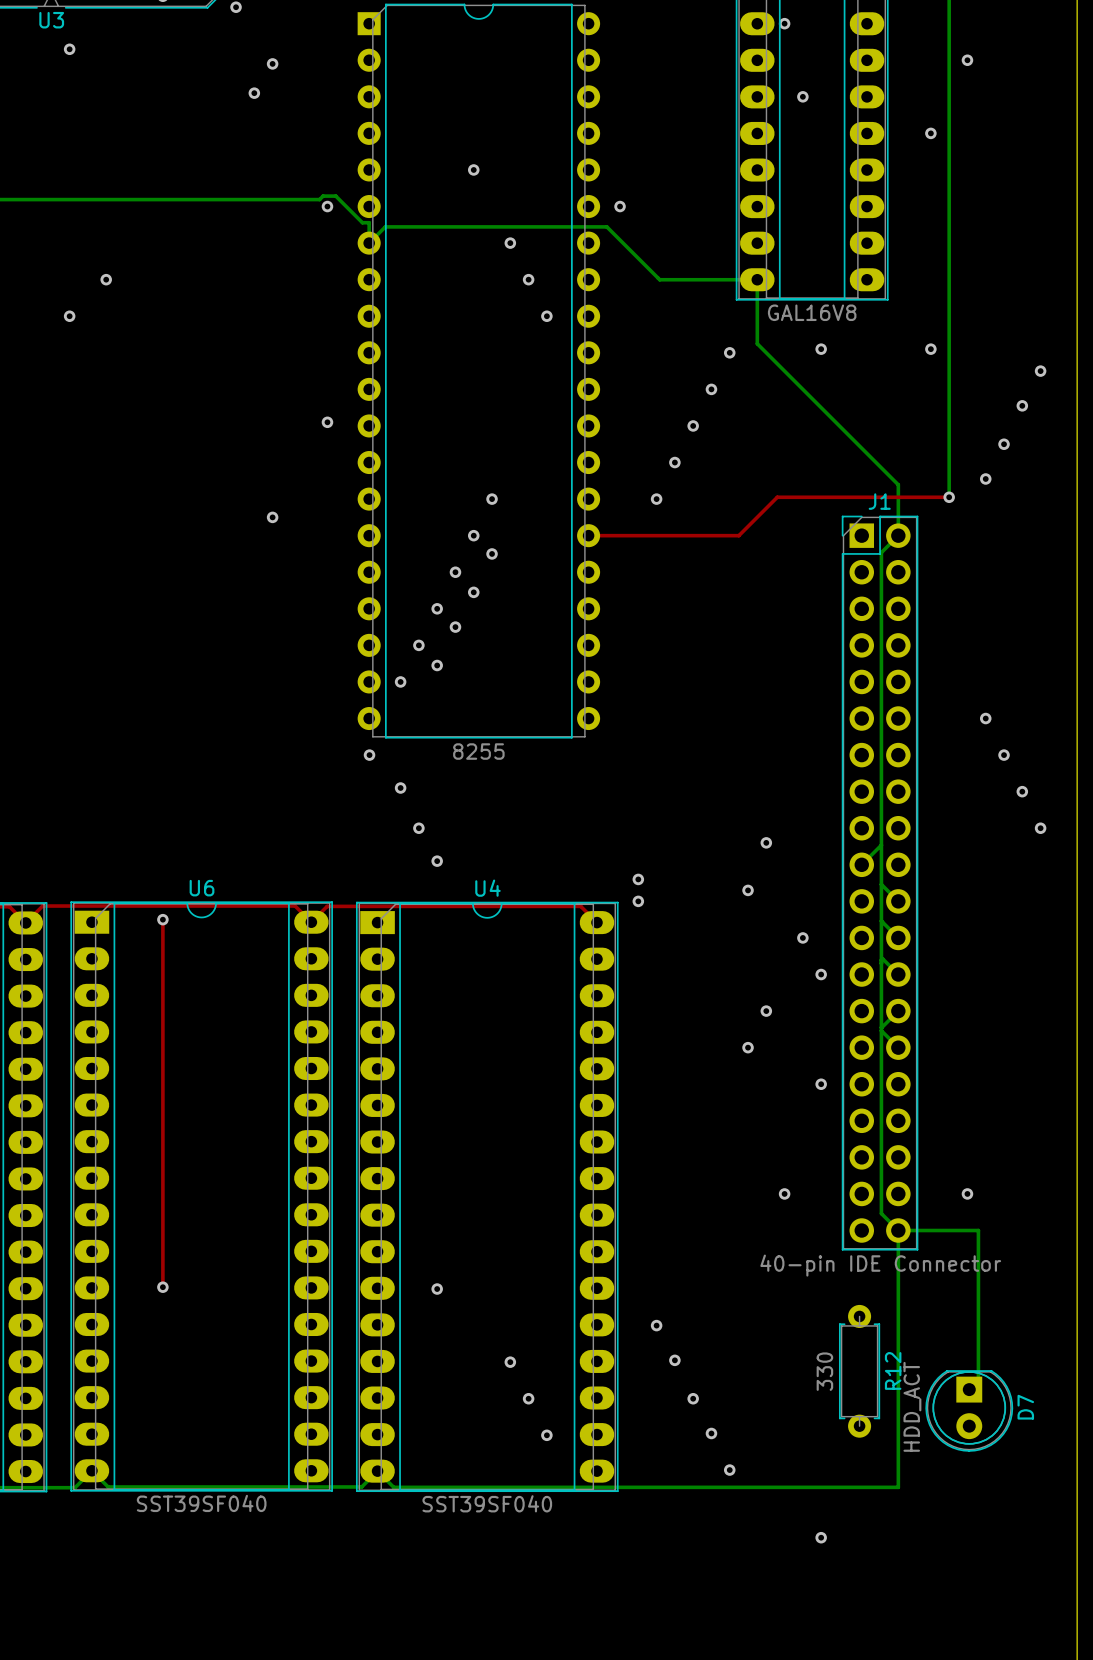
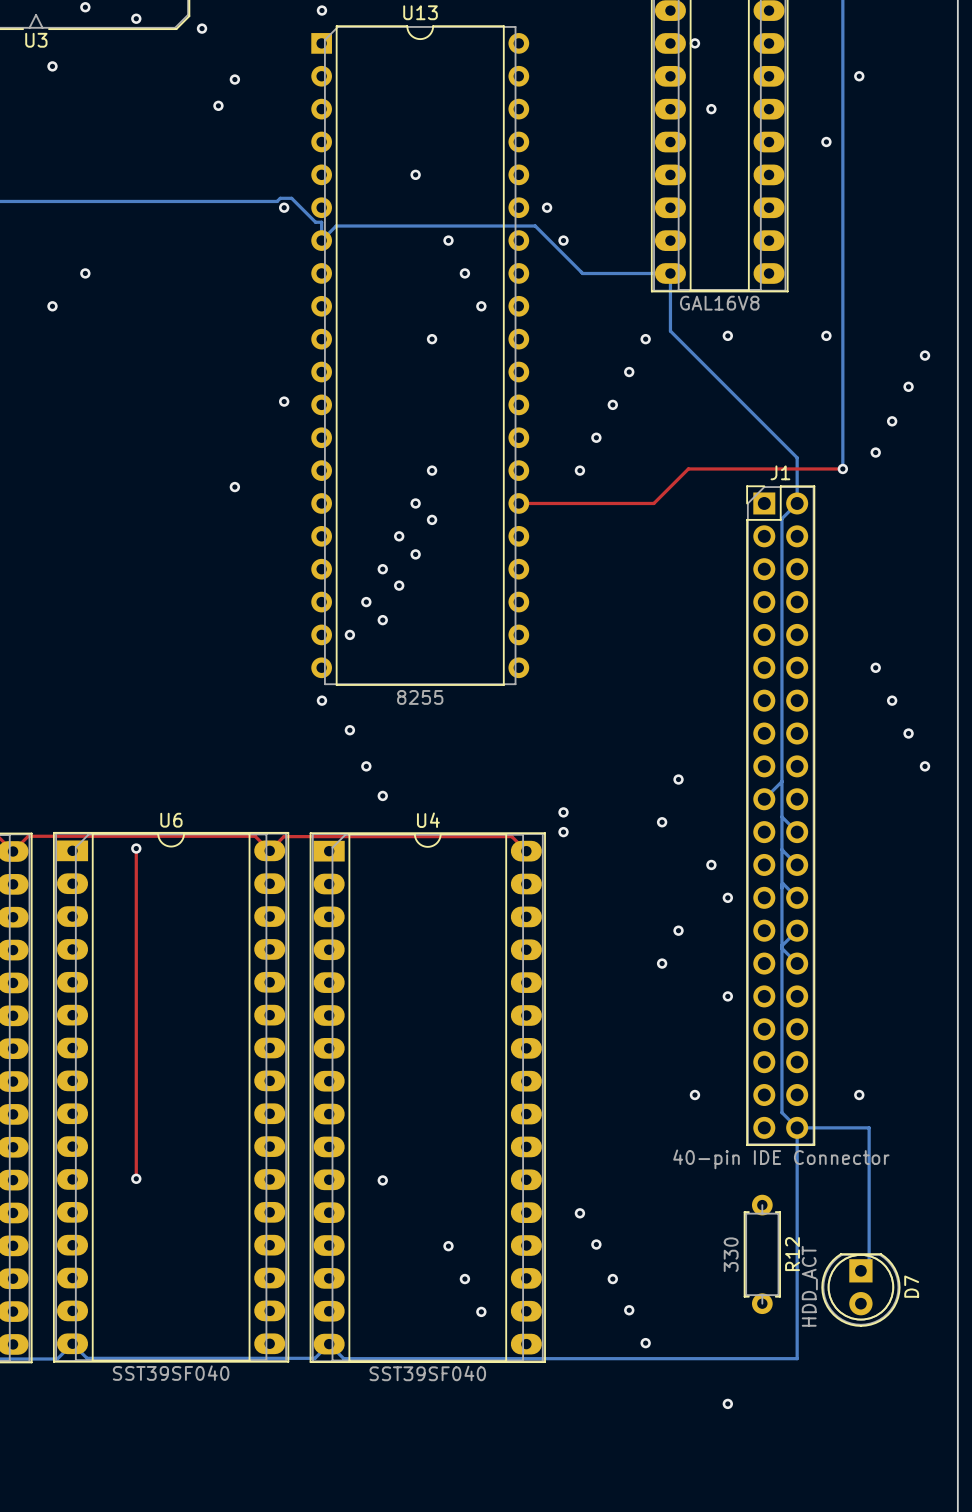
via: none -> (563, 240)
via: none -> (432, 339)

